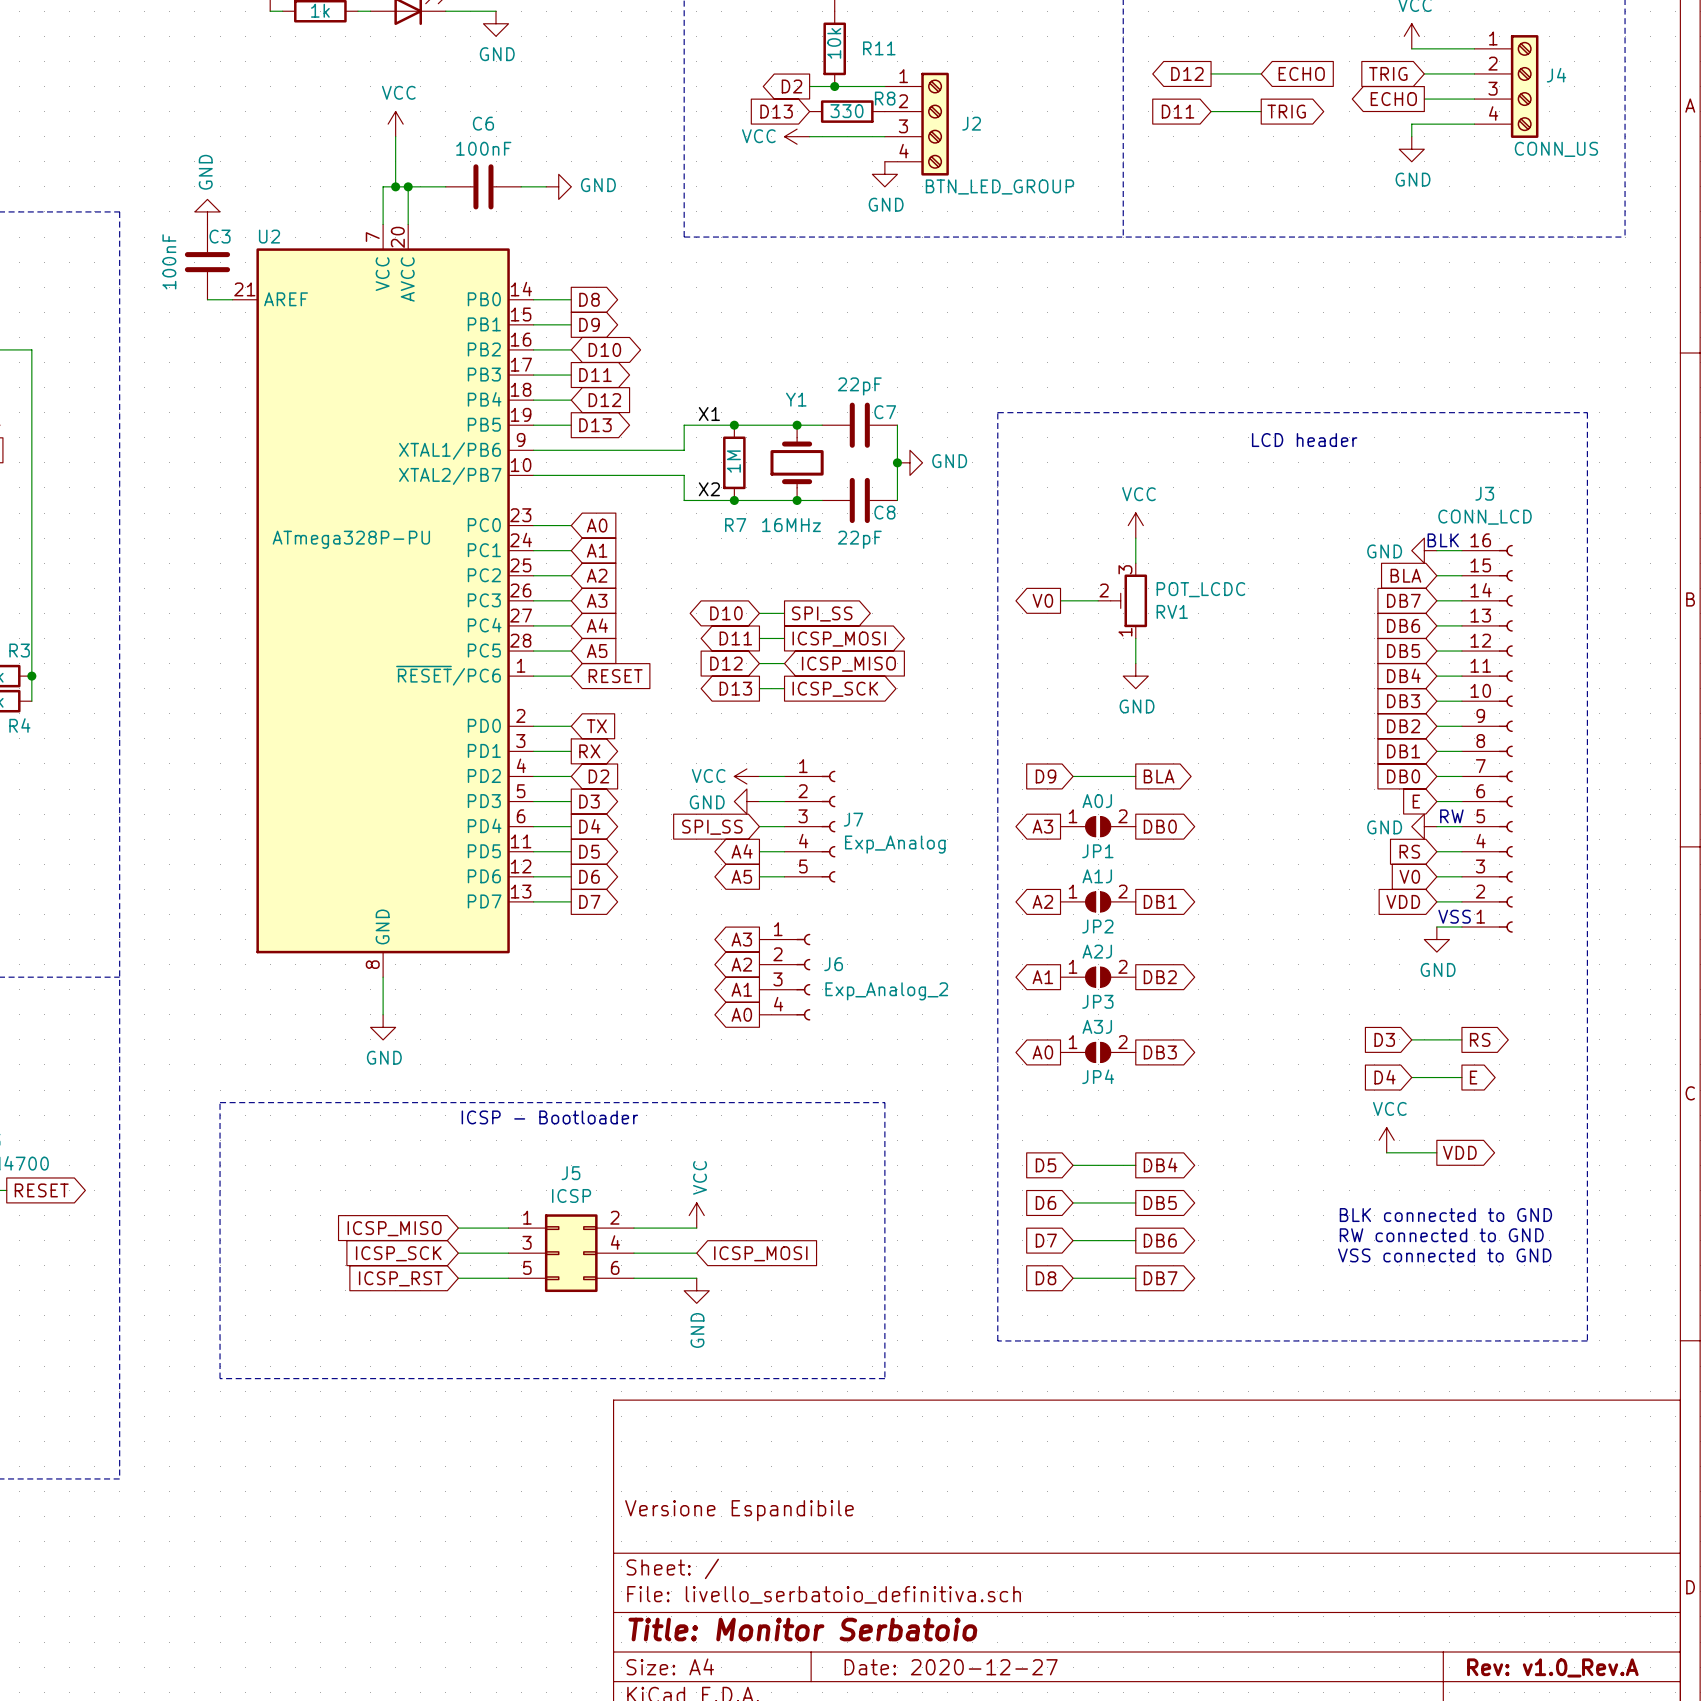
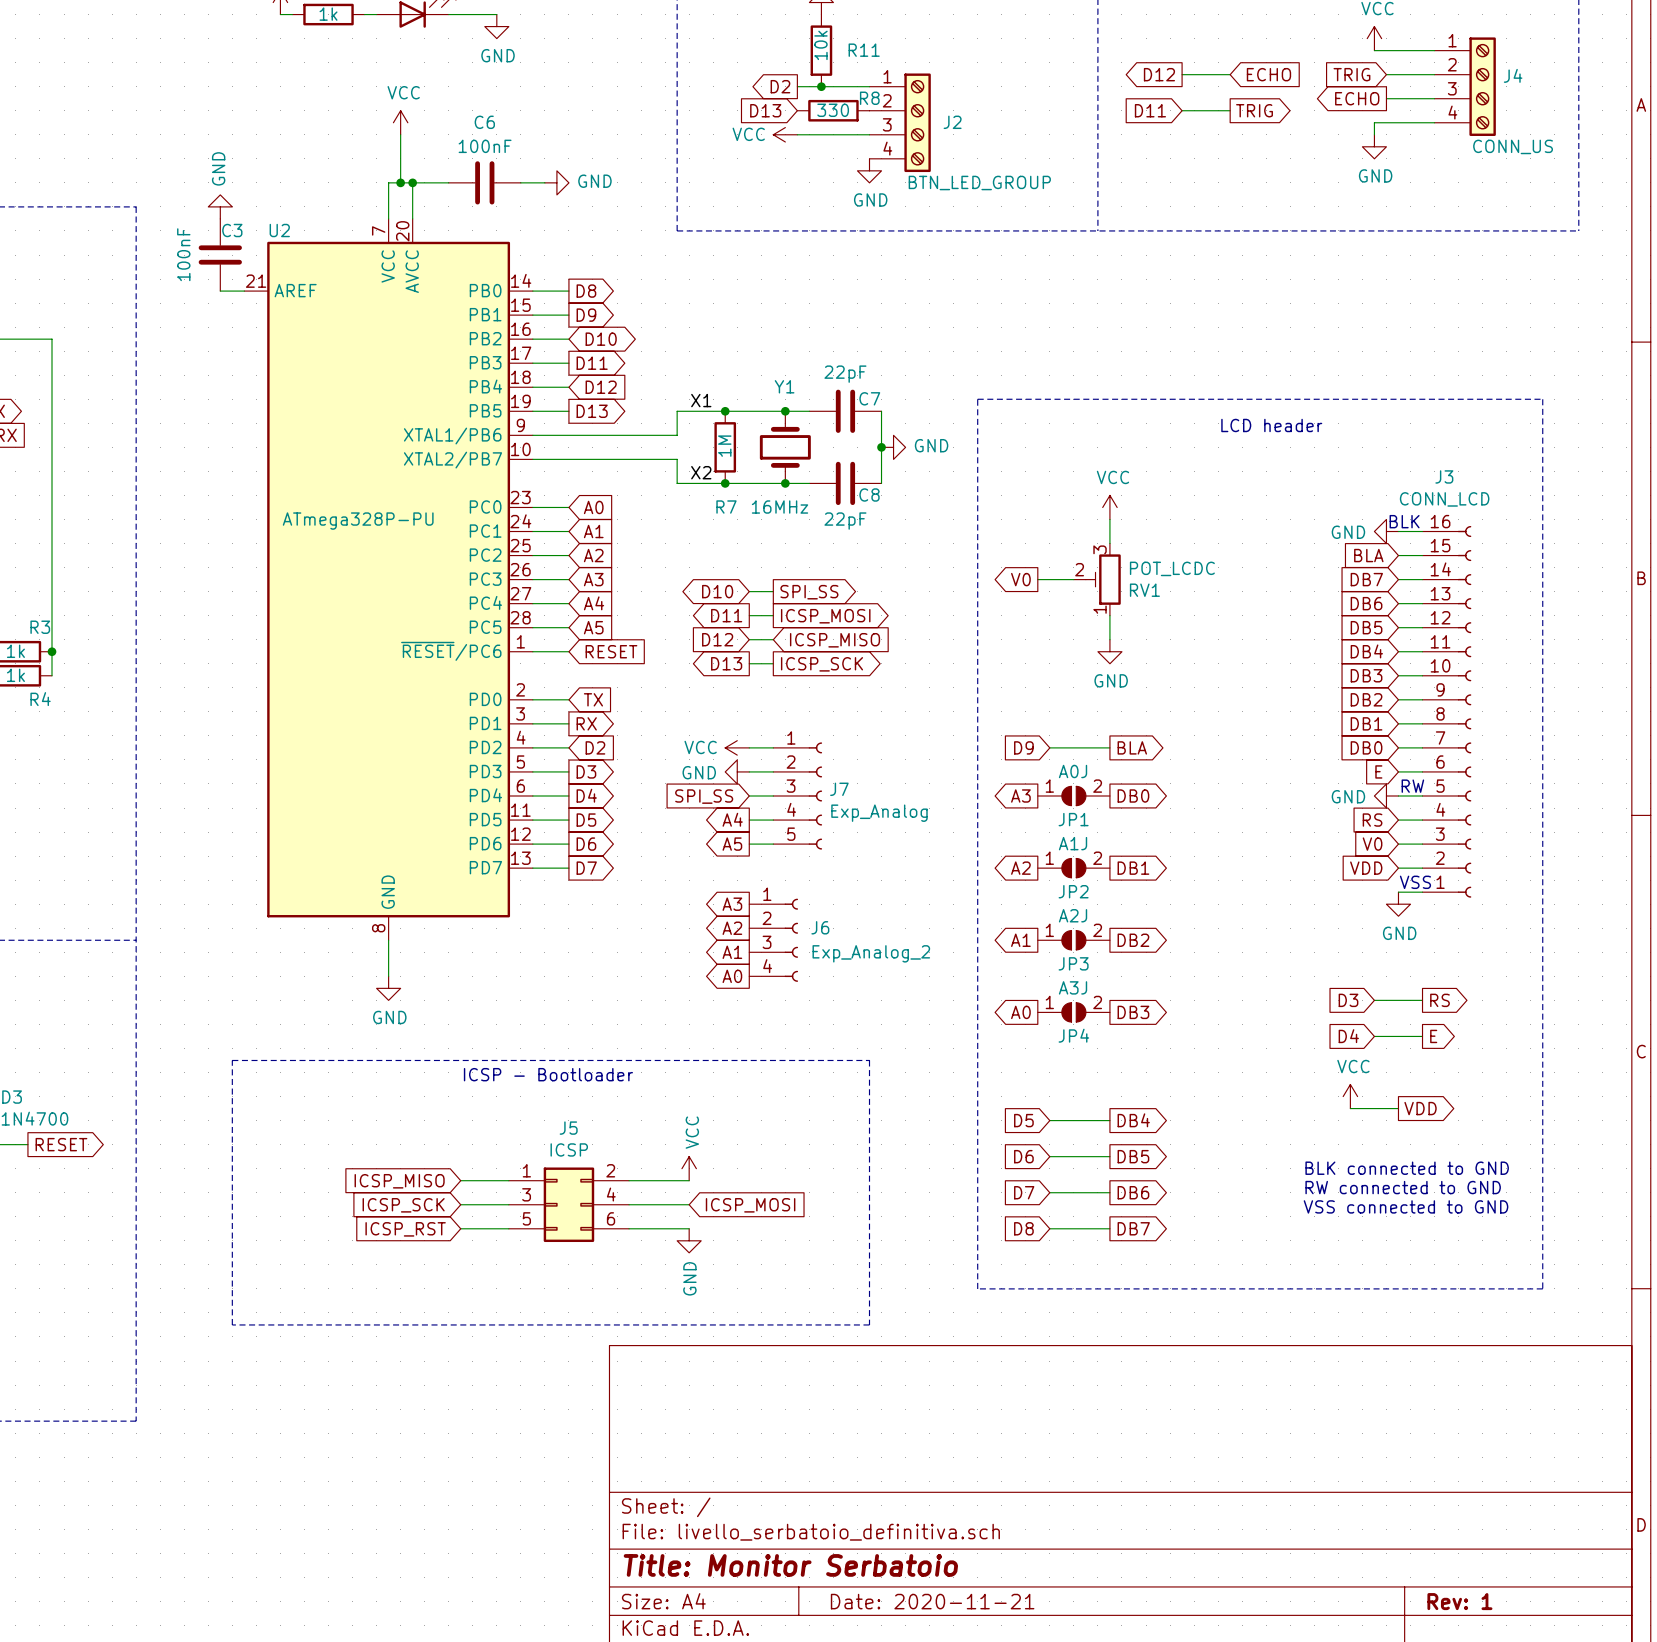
title block: Versione Espandibile (739, 1510) -> none
title block: Date: 2020-12-27 (951, 1667) -> Date: 2020-11-21 (932, 1601)
title block: Rev: v1.0_Rev.A (1552, 1667) -> Rev: 1 (1459, 1601)

